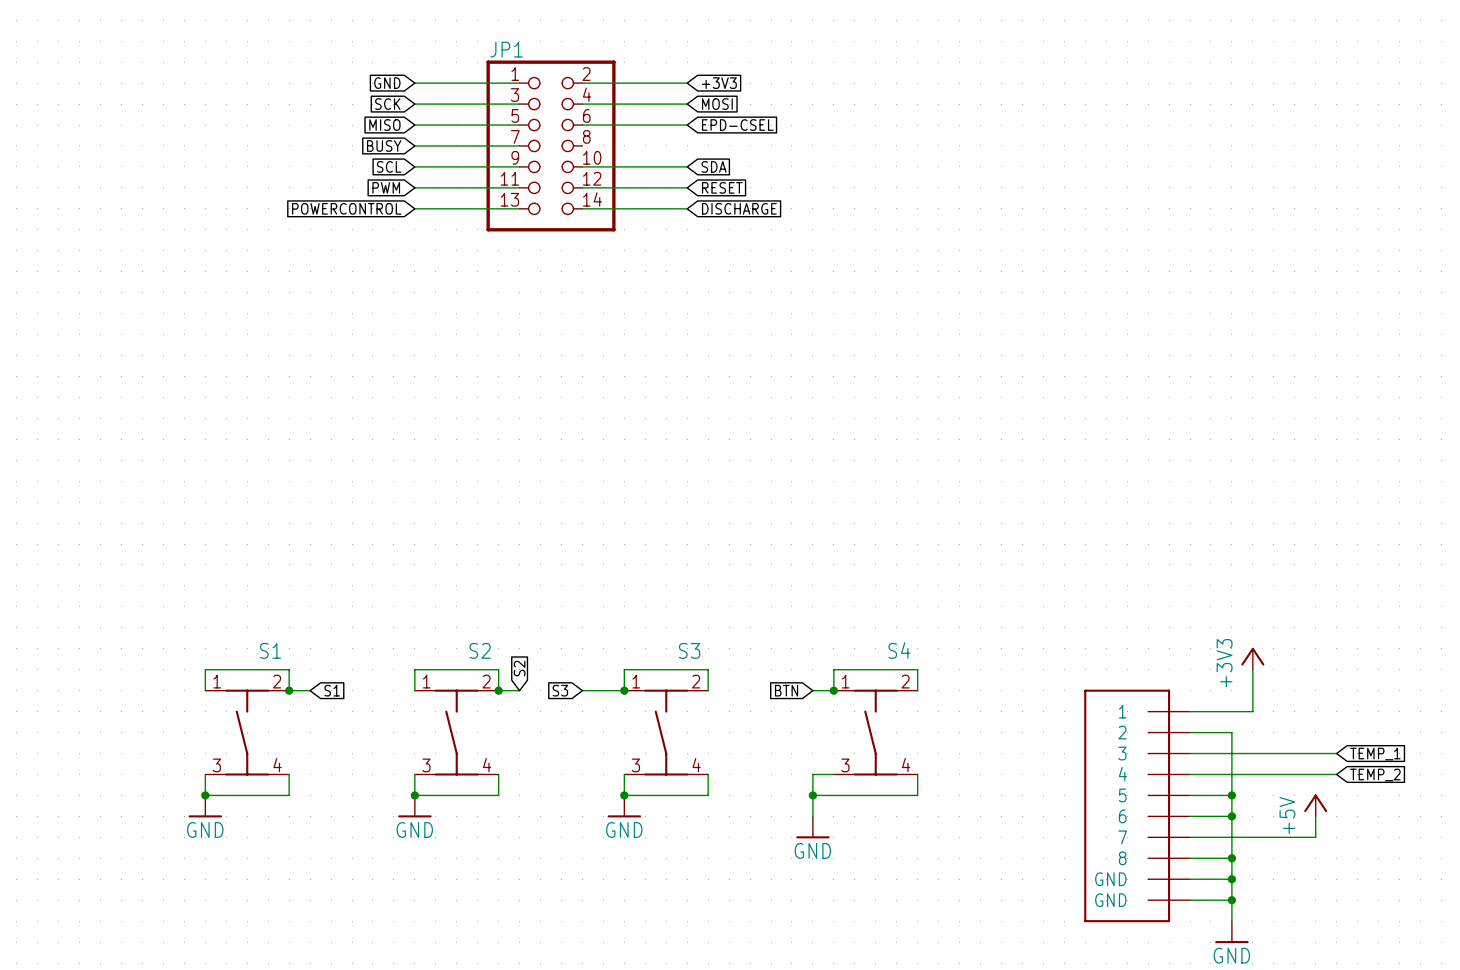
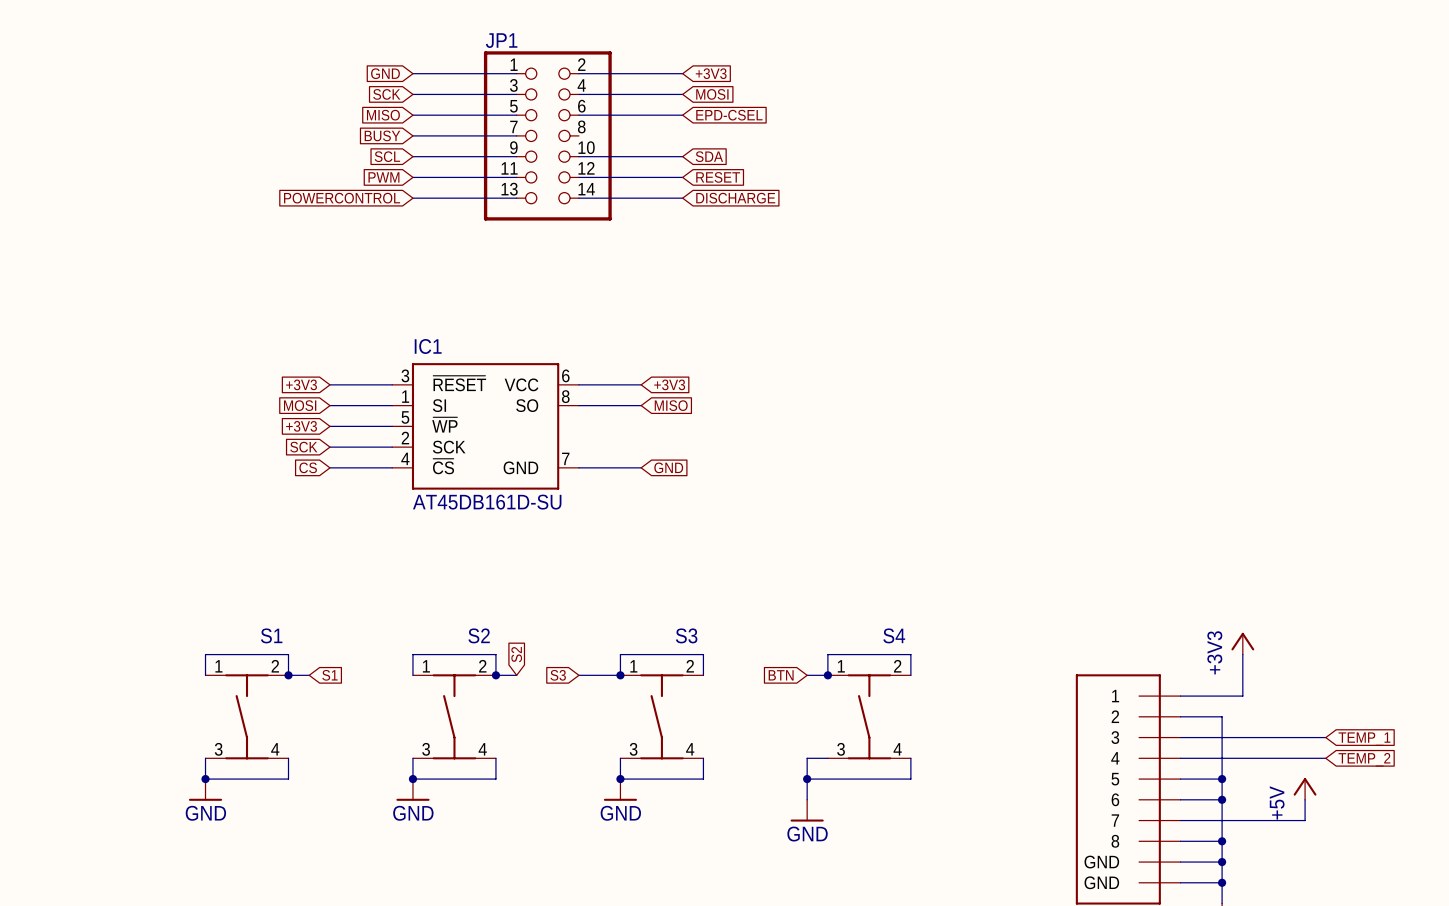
global label: none -> +3V3 (301, 384)
wire: none -> (329, 384) (392, 384)
wire: none -> (578, 384) (641, 384)
global label: none -> +3V3 (669, 384)
global label: none -> MOSI (300, 405)
wire: none -> (329, 405) (392, 405)
wire: none -> (578, 405) (641, 405)
global label: none -> MISO (671, 405)
global label: none -> +3V3 (301, 426)
wire: none -> (329, 426) (392, 426)
IC1: none -> AT45DB161D-SU (485, 426)
global label: none -> SCK (303, 447)
wire: none -> (329, 447) (392, 447)
global label: none -> CS (308, 467)
wire: none -> (329, 467) (392, 467)
wire: none -> (578, 467) (641, 467)
global label: none -> GND (668, 467)

